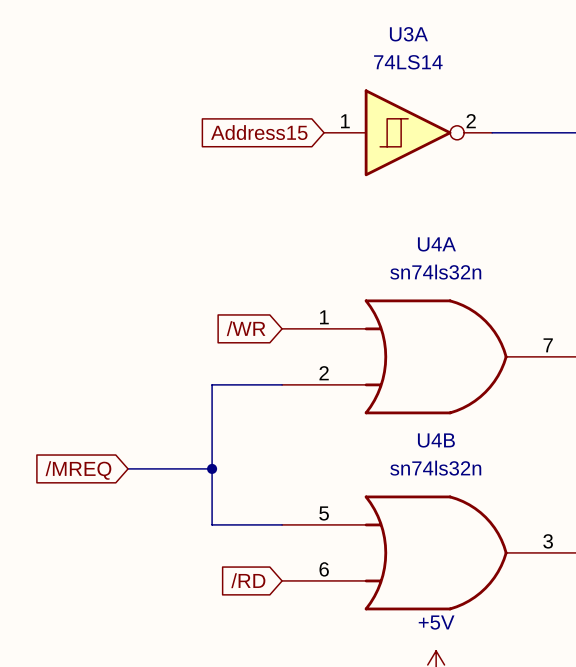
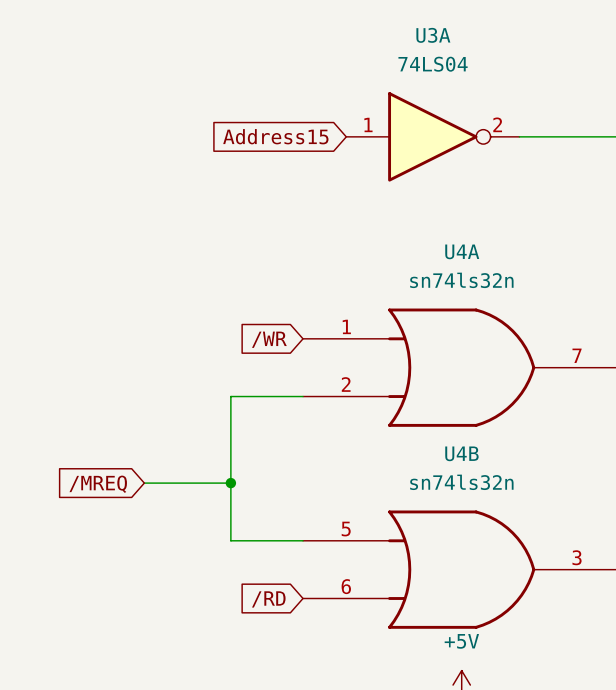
U3A value: 74LS14 (408, 62) -> 74LS04 (433, 64)
U3A symbol: [324, 89, 493, 177] -> [346, 92, 520, 182]

